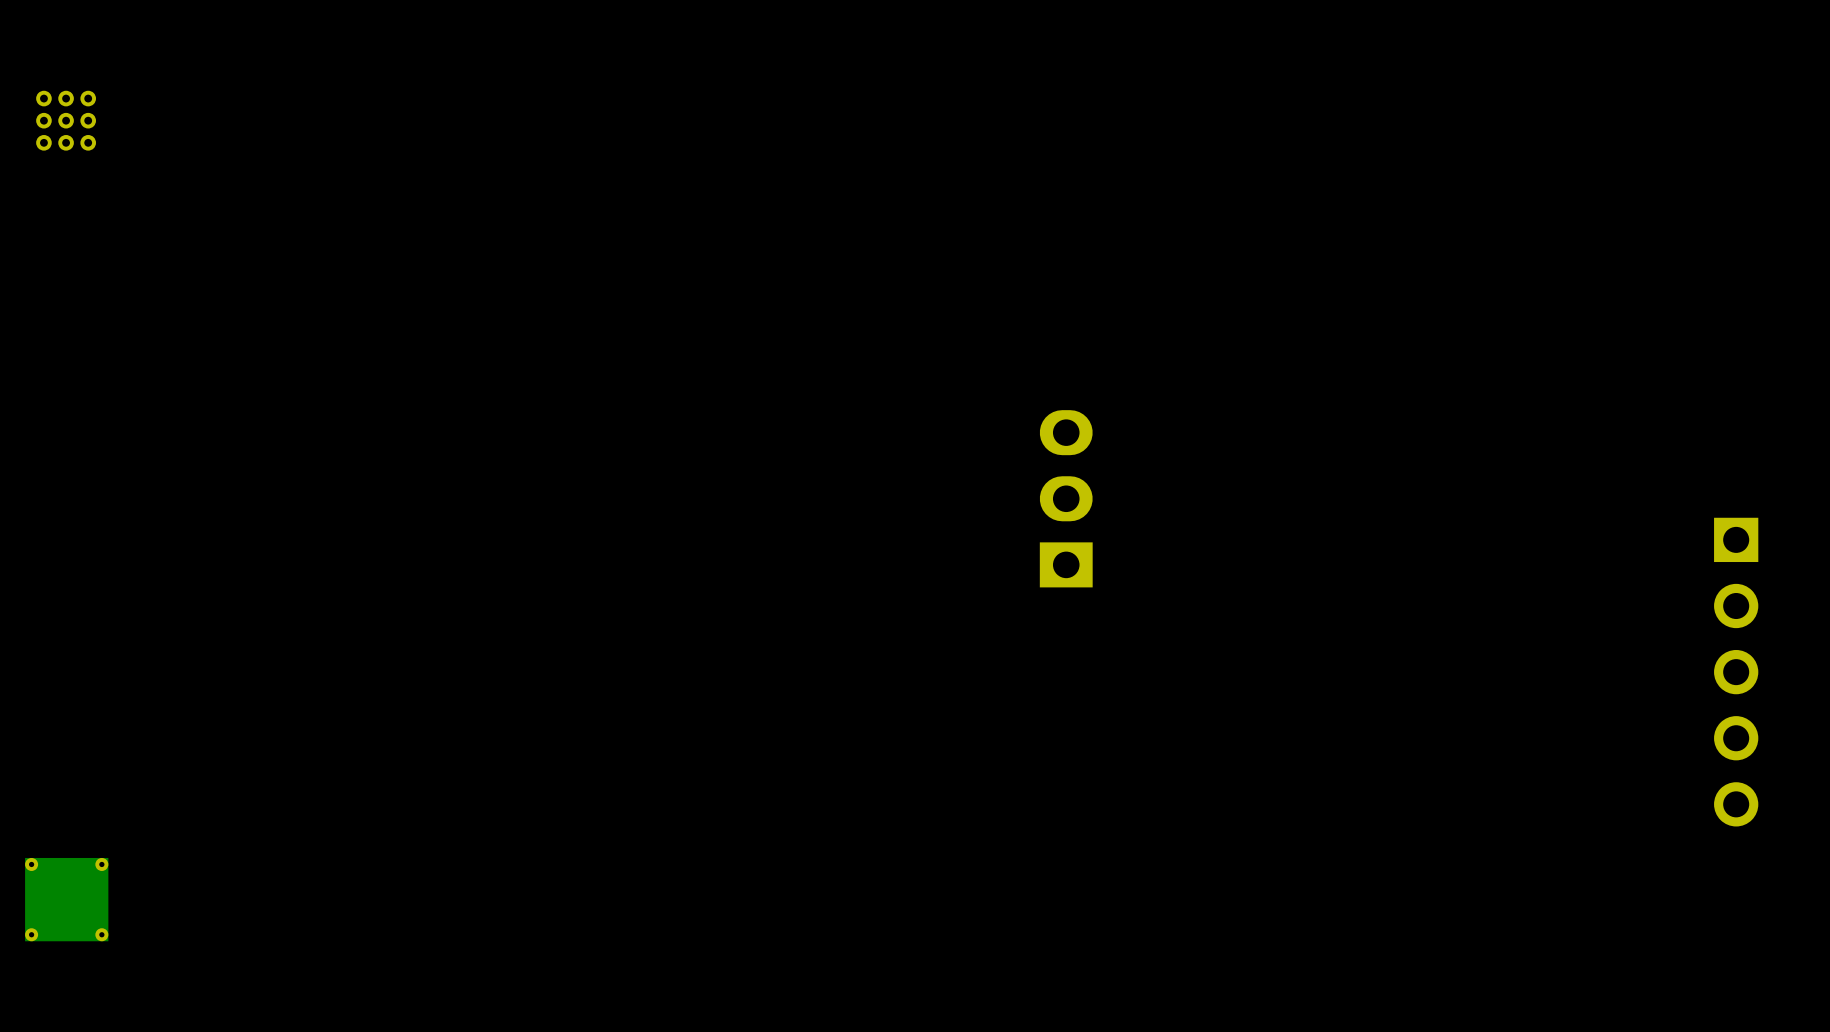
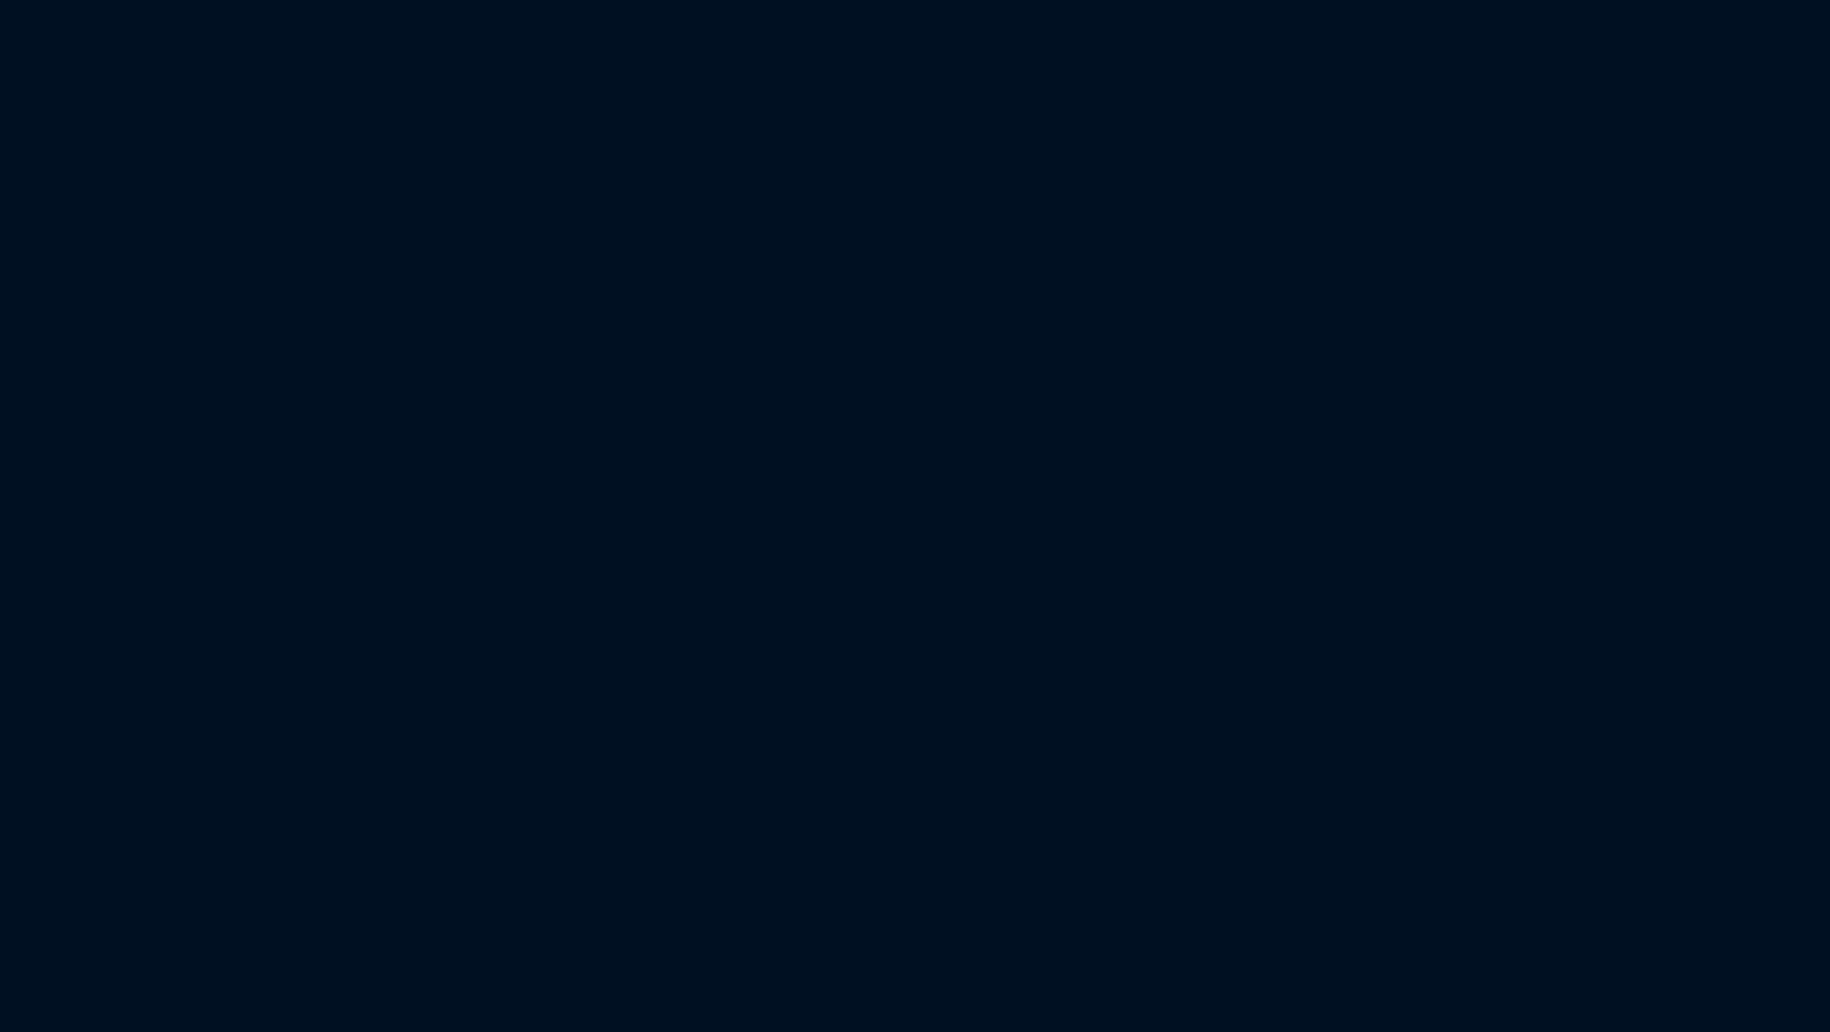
part: (66, 120) -> none
part: (1066, 498) -> none
part: (1736, 672) -> none
part: (66, 899) -> none

